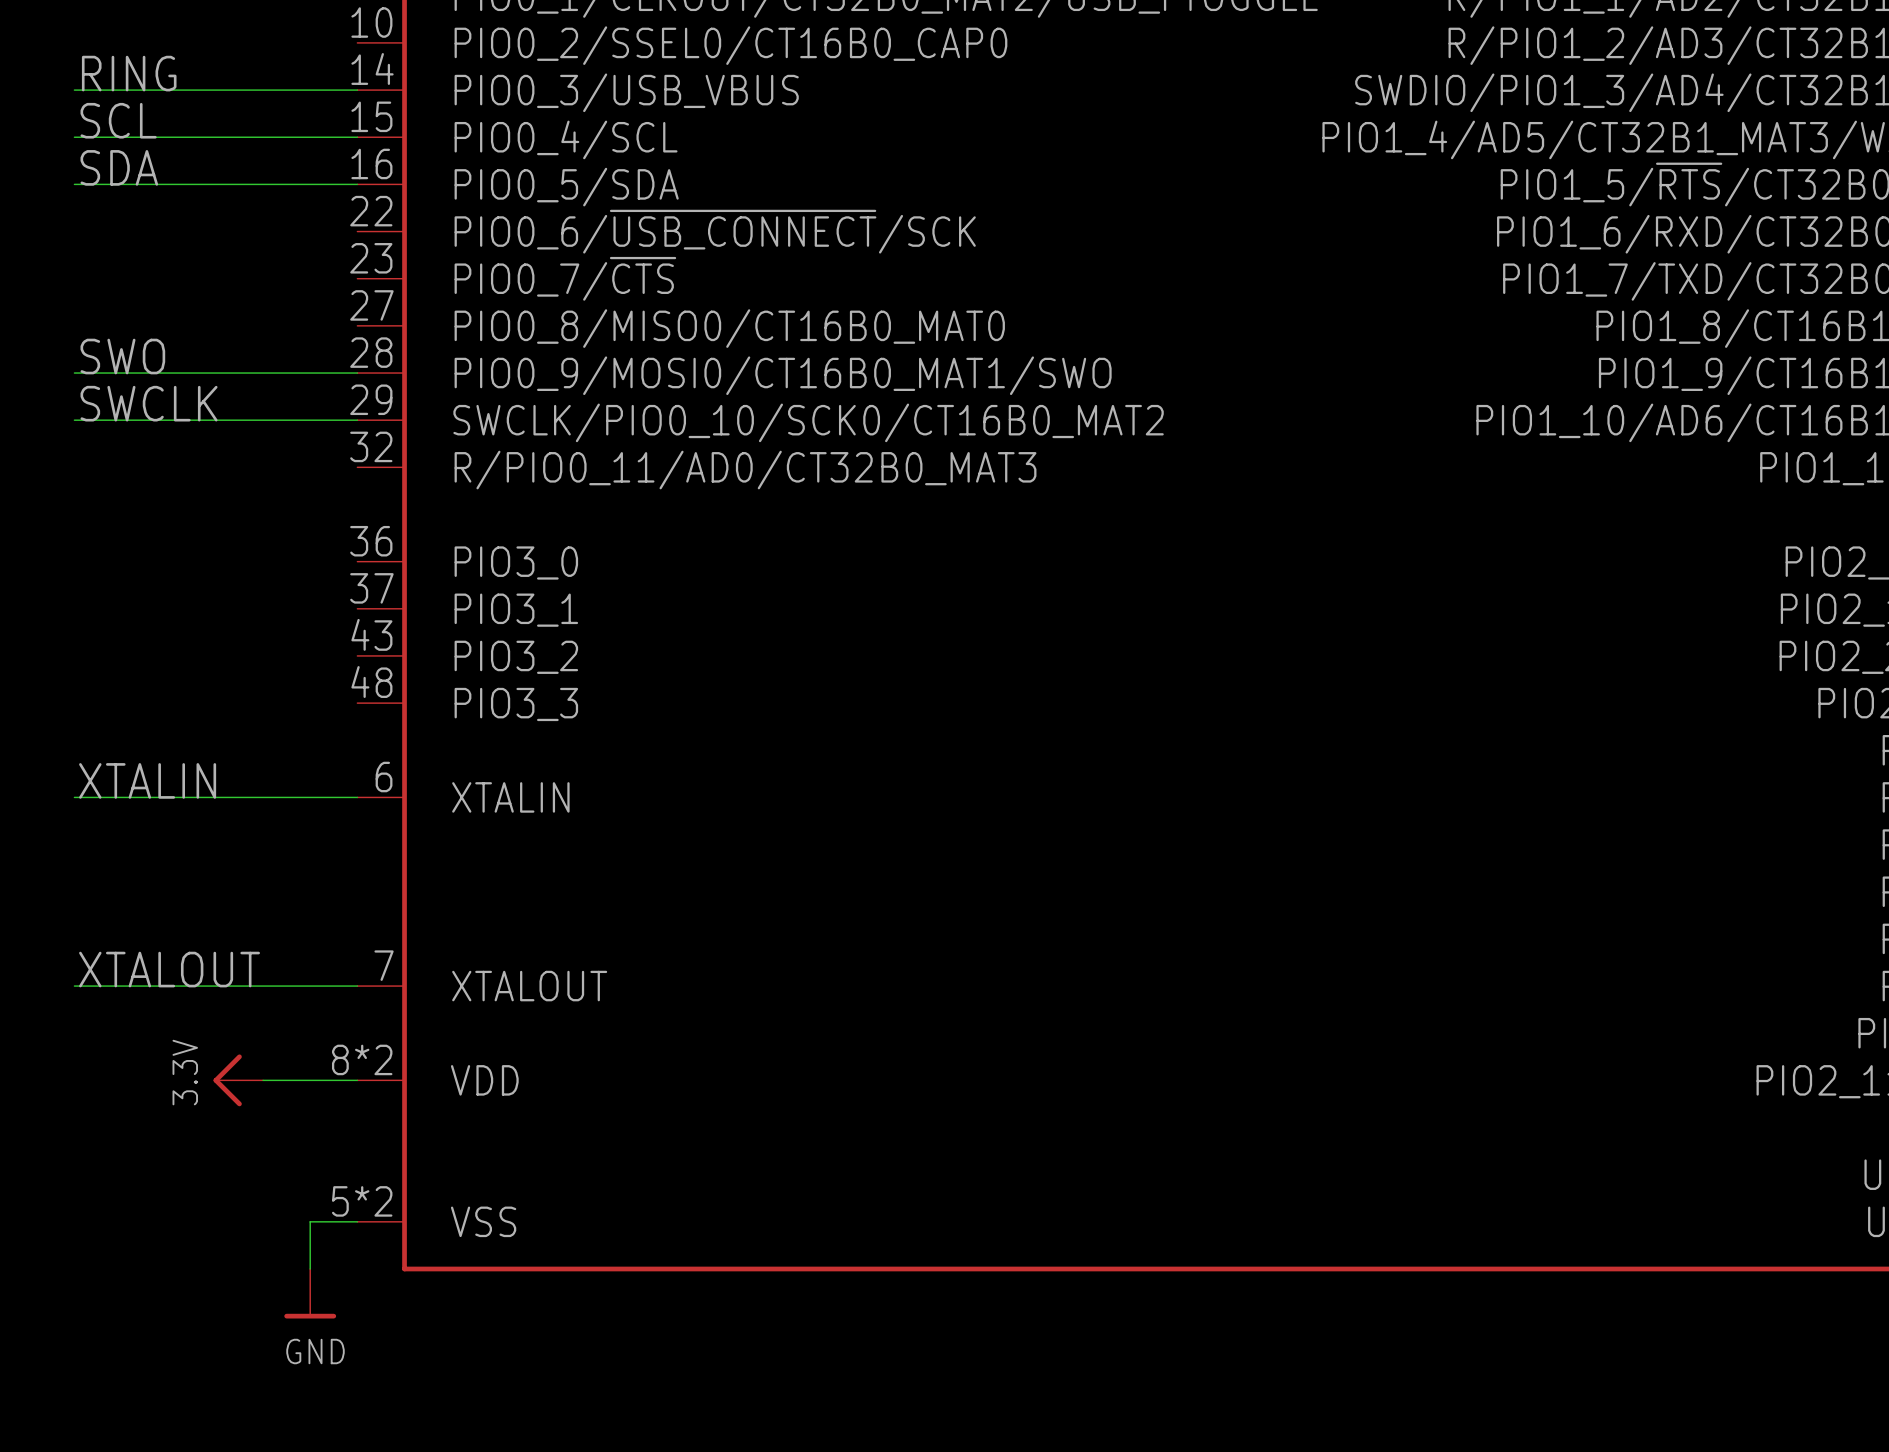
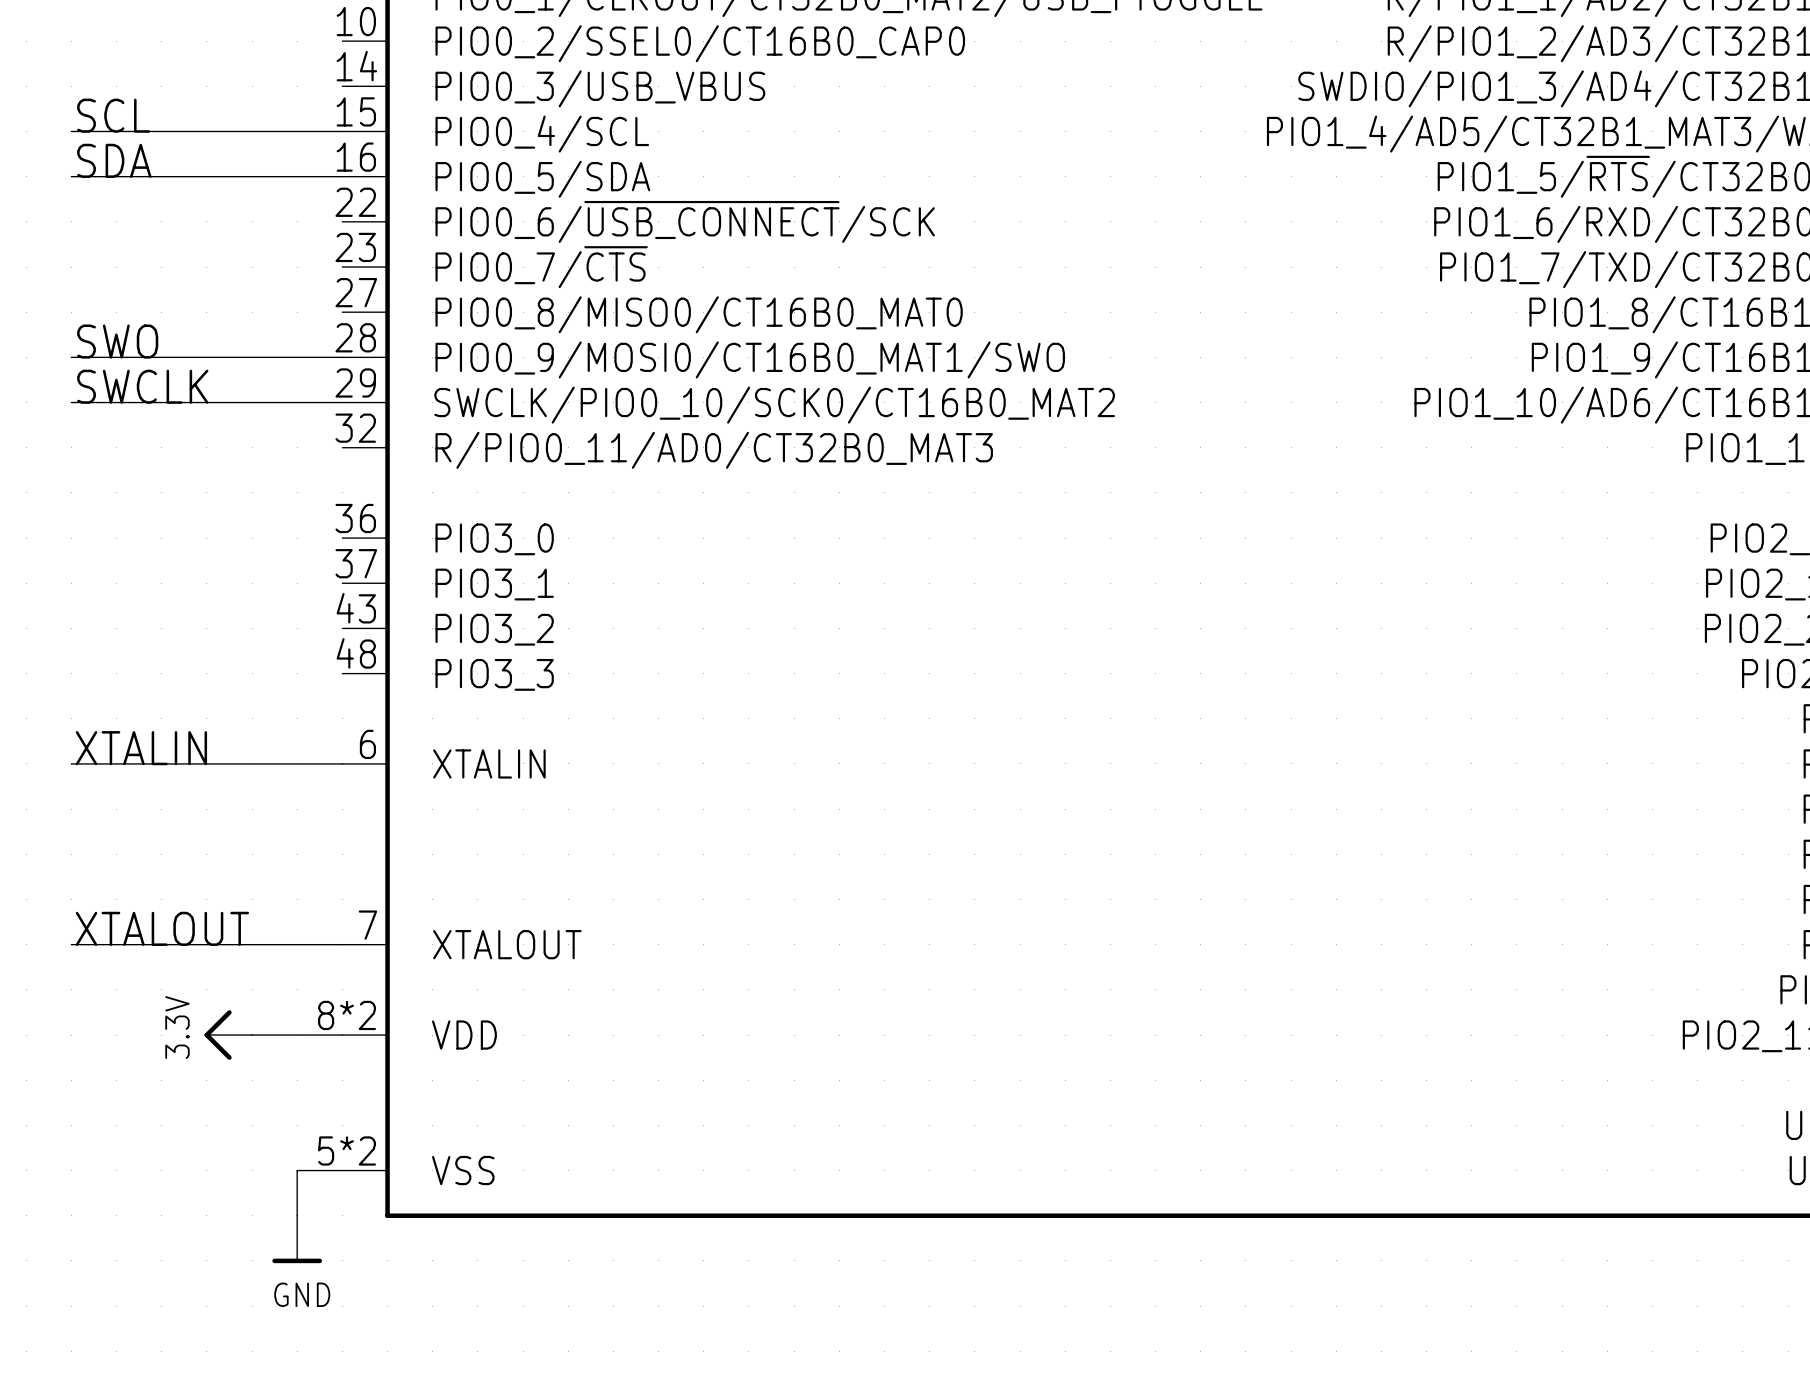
label: RING (129, 73) -> none
wire: (74, 90) (357, 90) -> none

